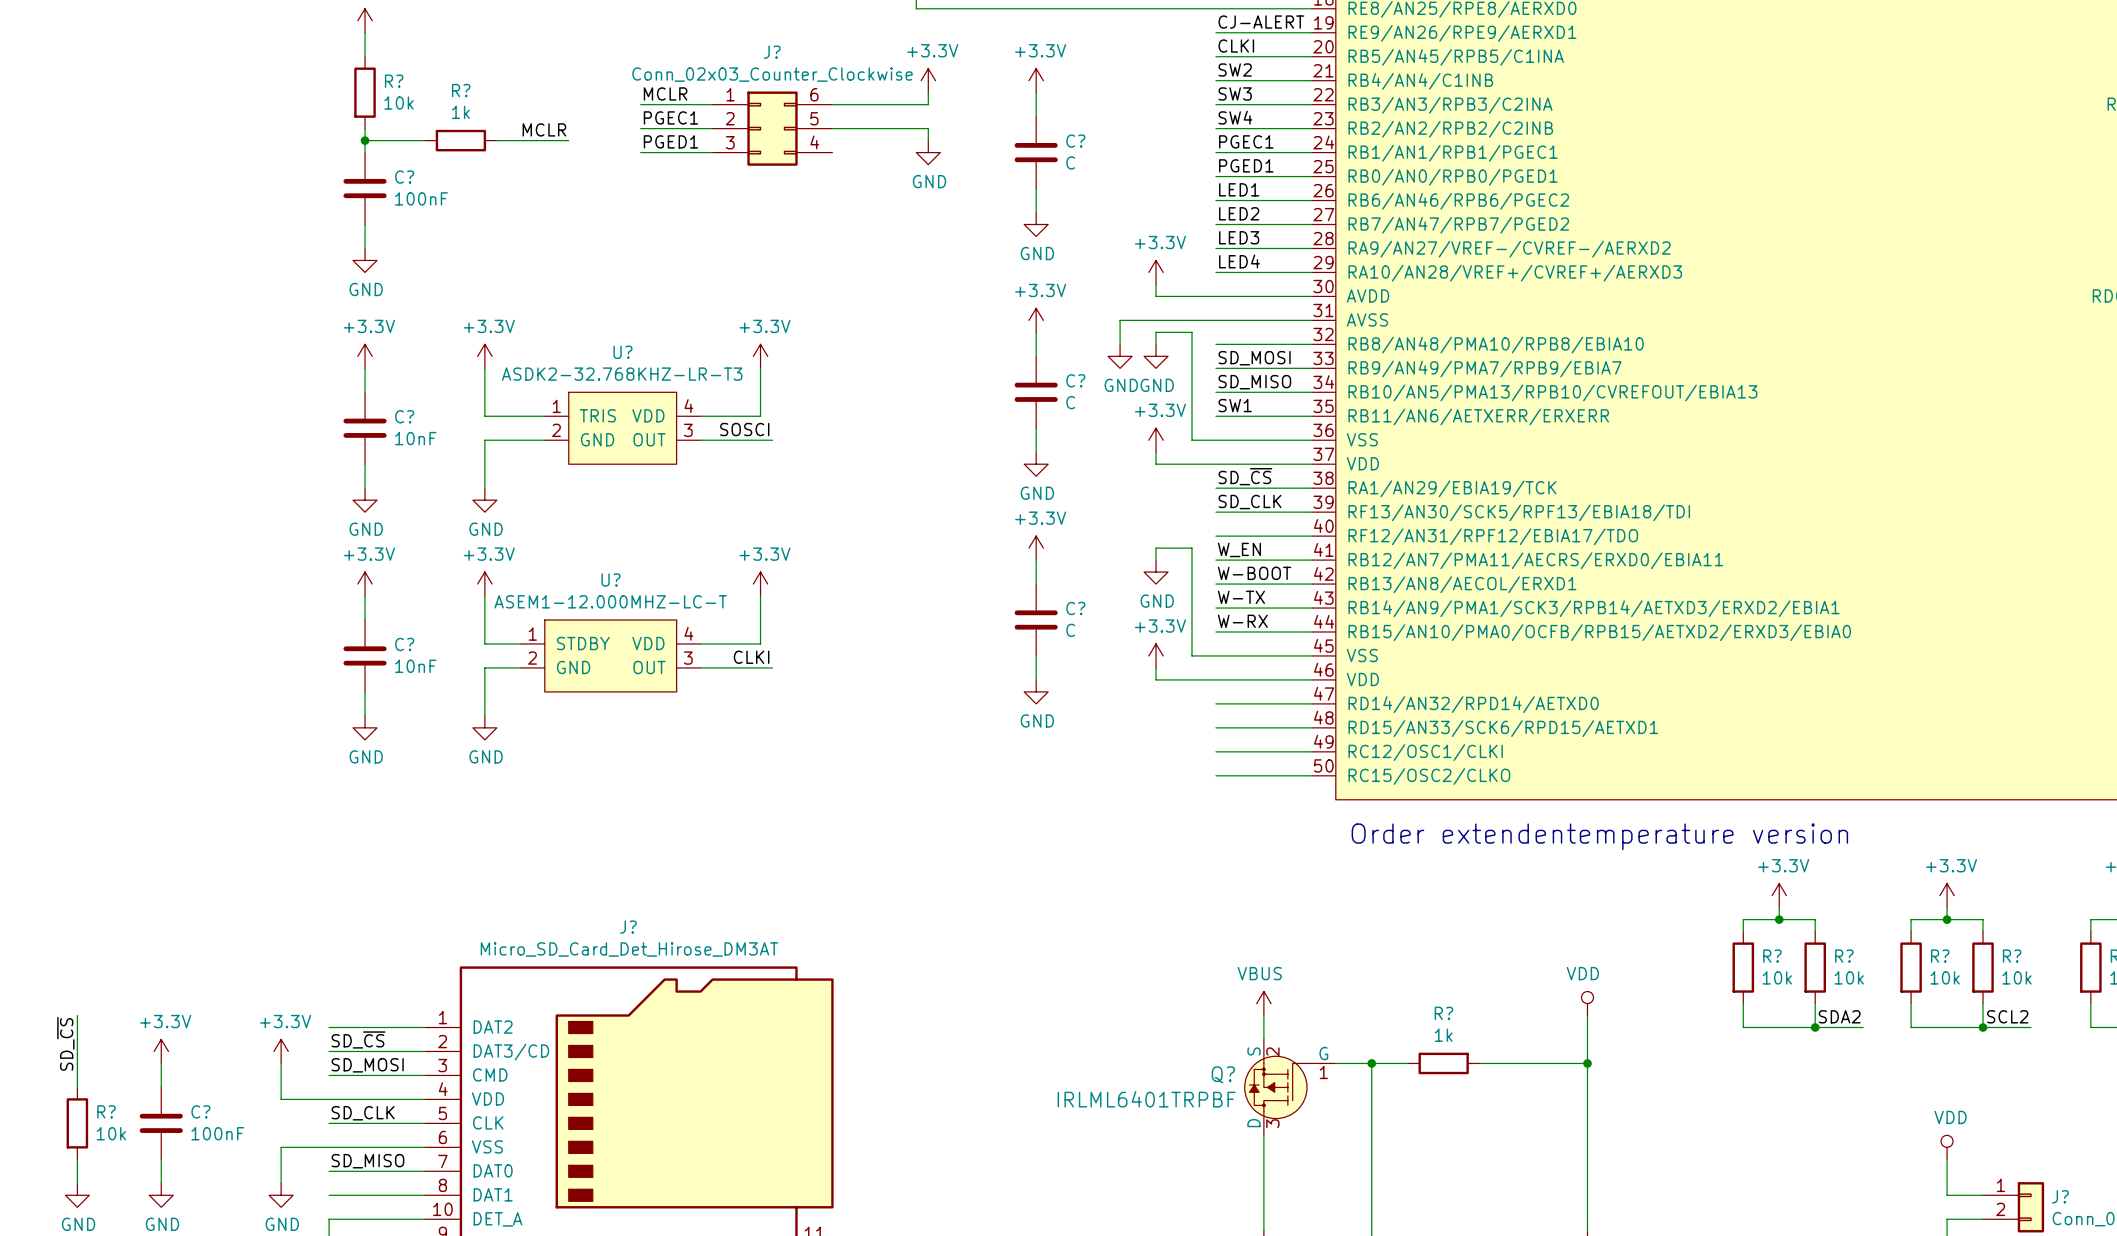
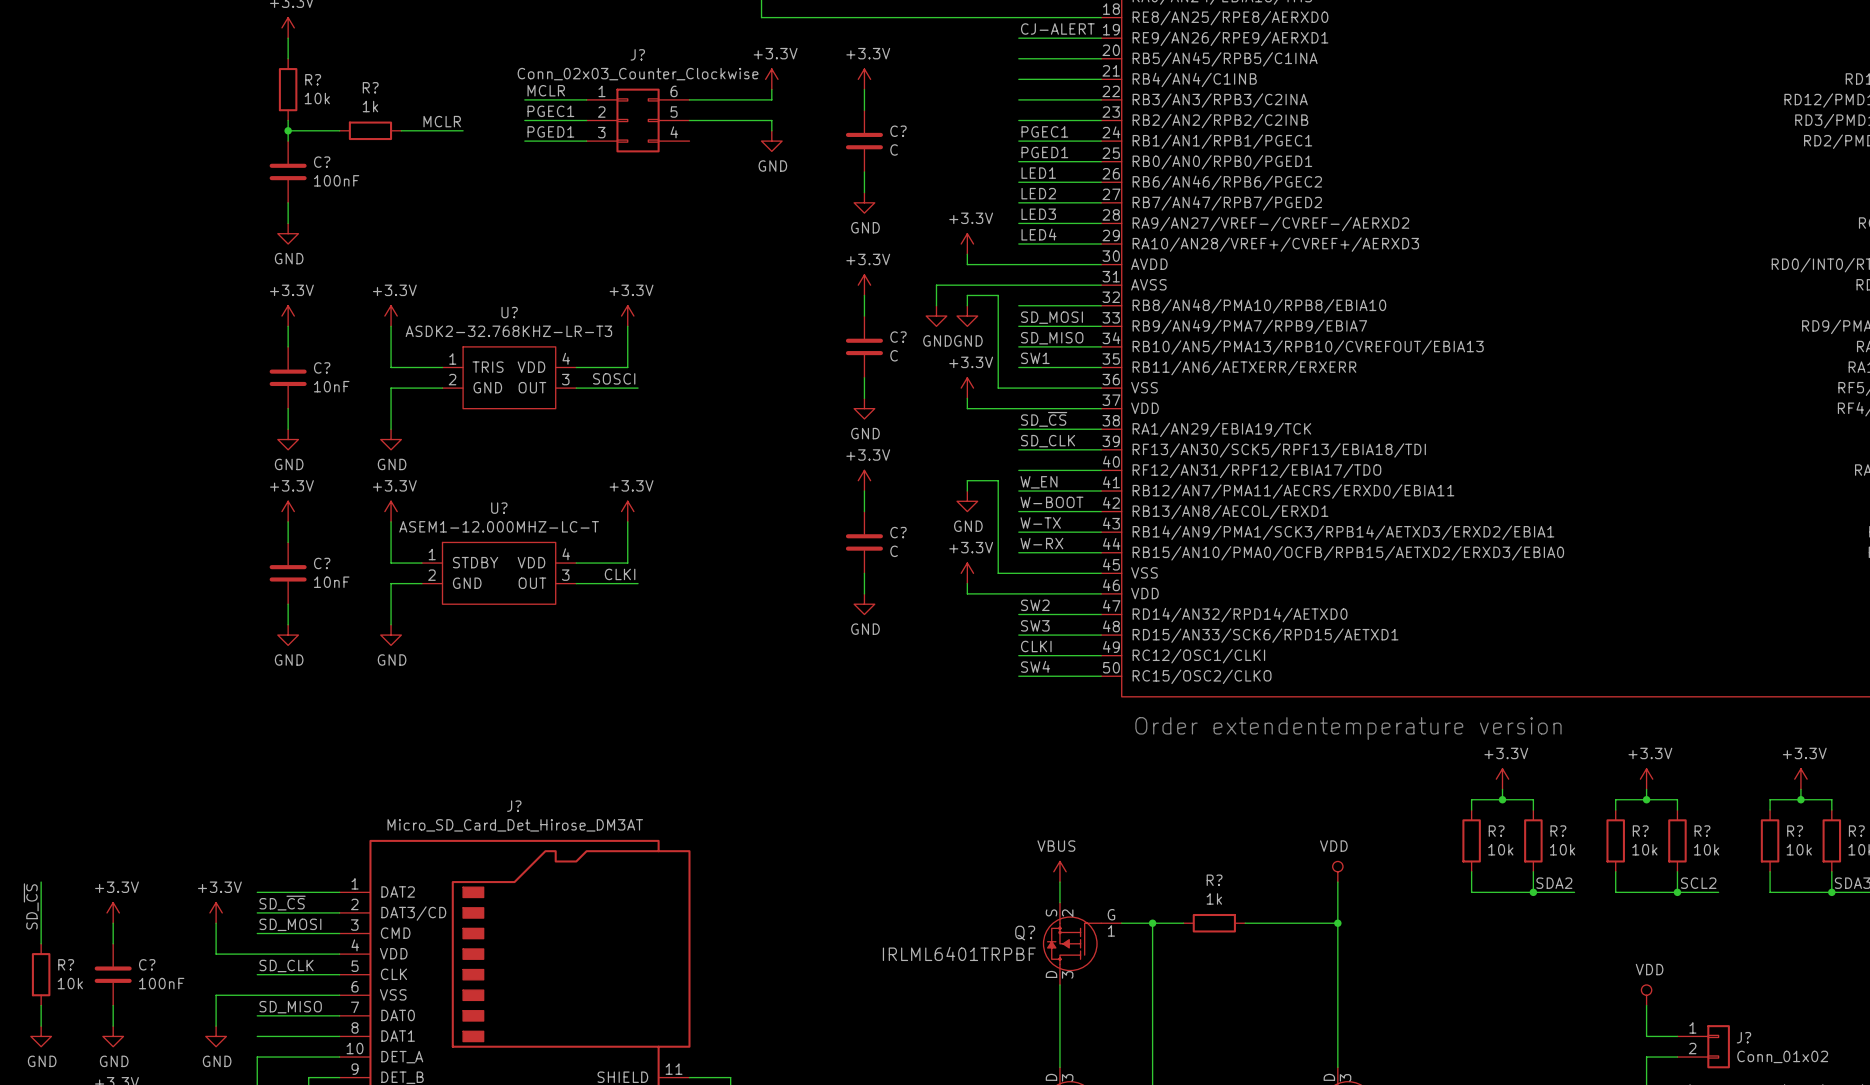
label: CLKI (1236, 46) -> none
label: SW2 (1235, 69) -> none
label: SW3 (1235, 93) -> none
label: SW4 (1235, 117) -> none
label: none -> SW2 (1035, 605)
label: none -> SW3 (1035, 625)
label: none -> CLKI (1036, 646)
label: none -> SW4 (1035, 666)

